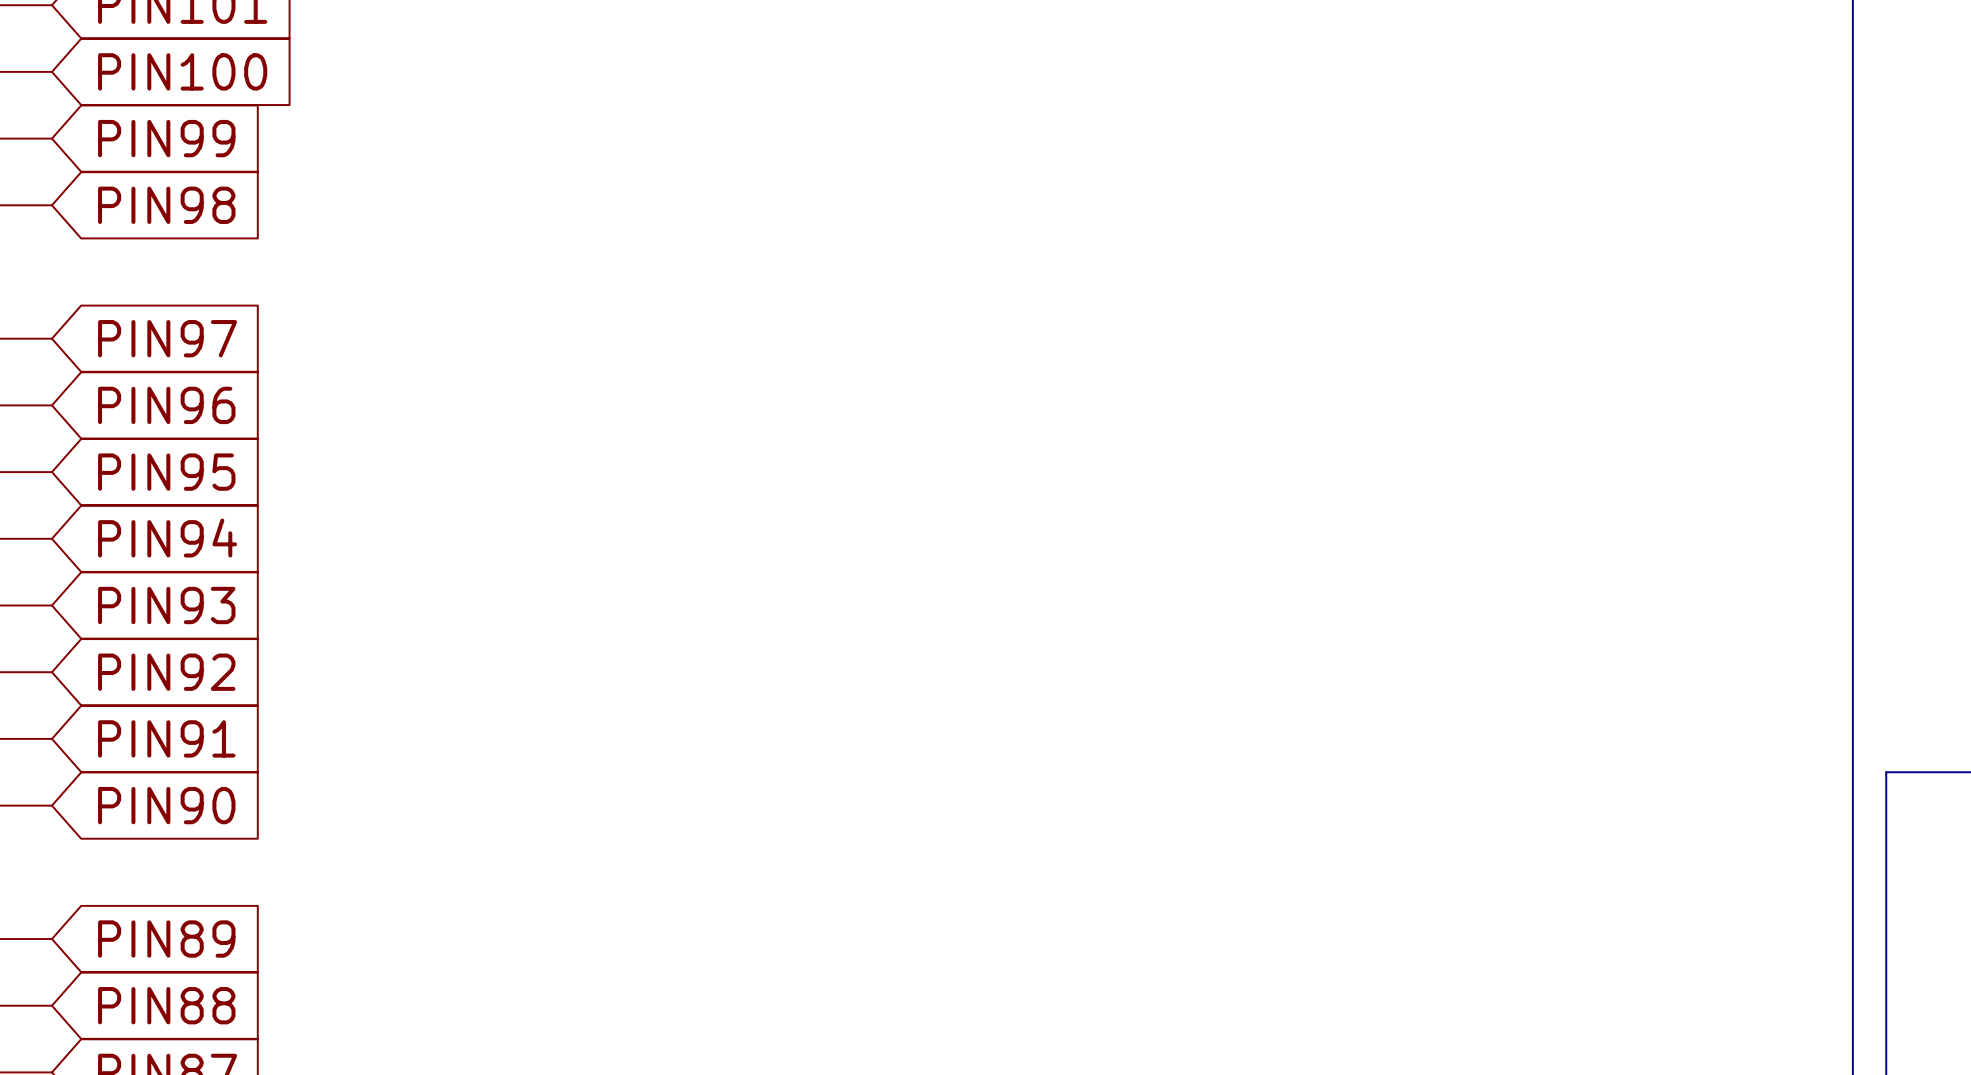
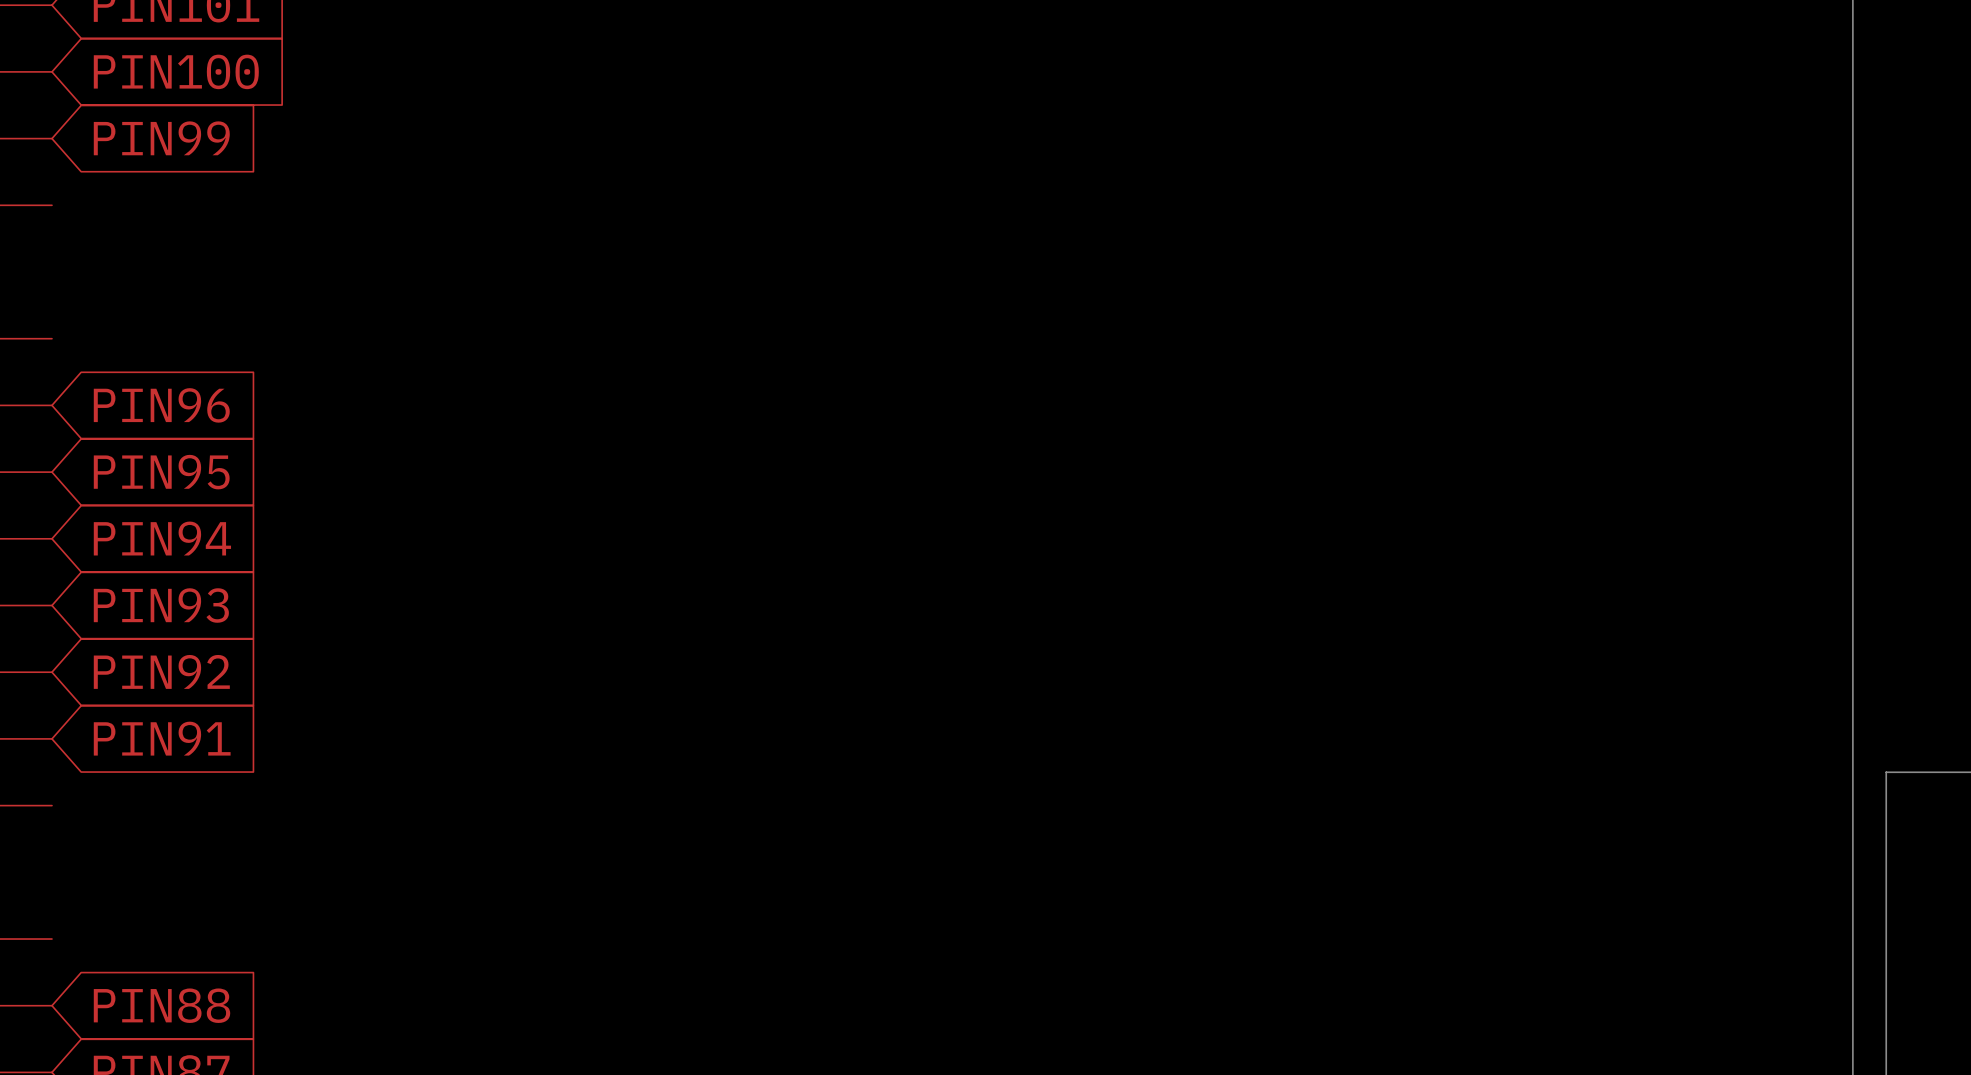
global label: PIN98 (166, 205) -> none
global label: PIN97 (167, 338) -> none
global label: PIN90 (166, 805) -> none
global label: PIN89 (166, 939) -> none

